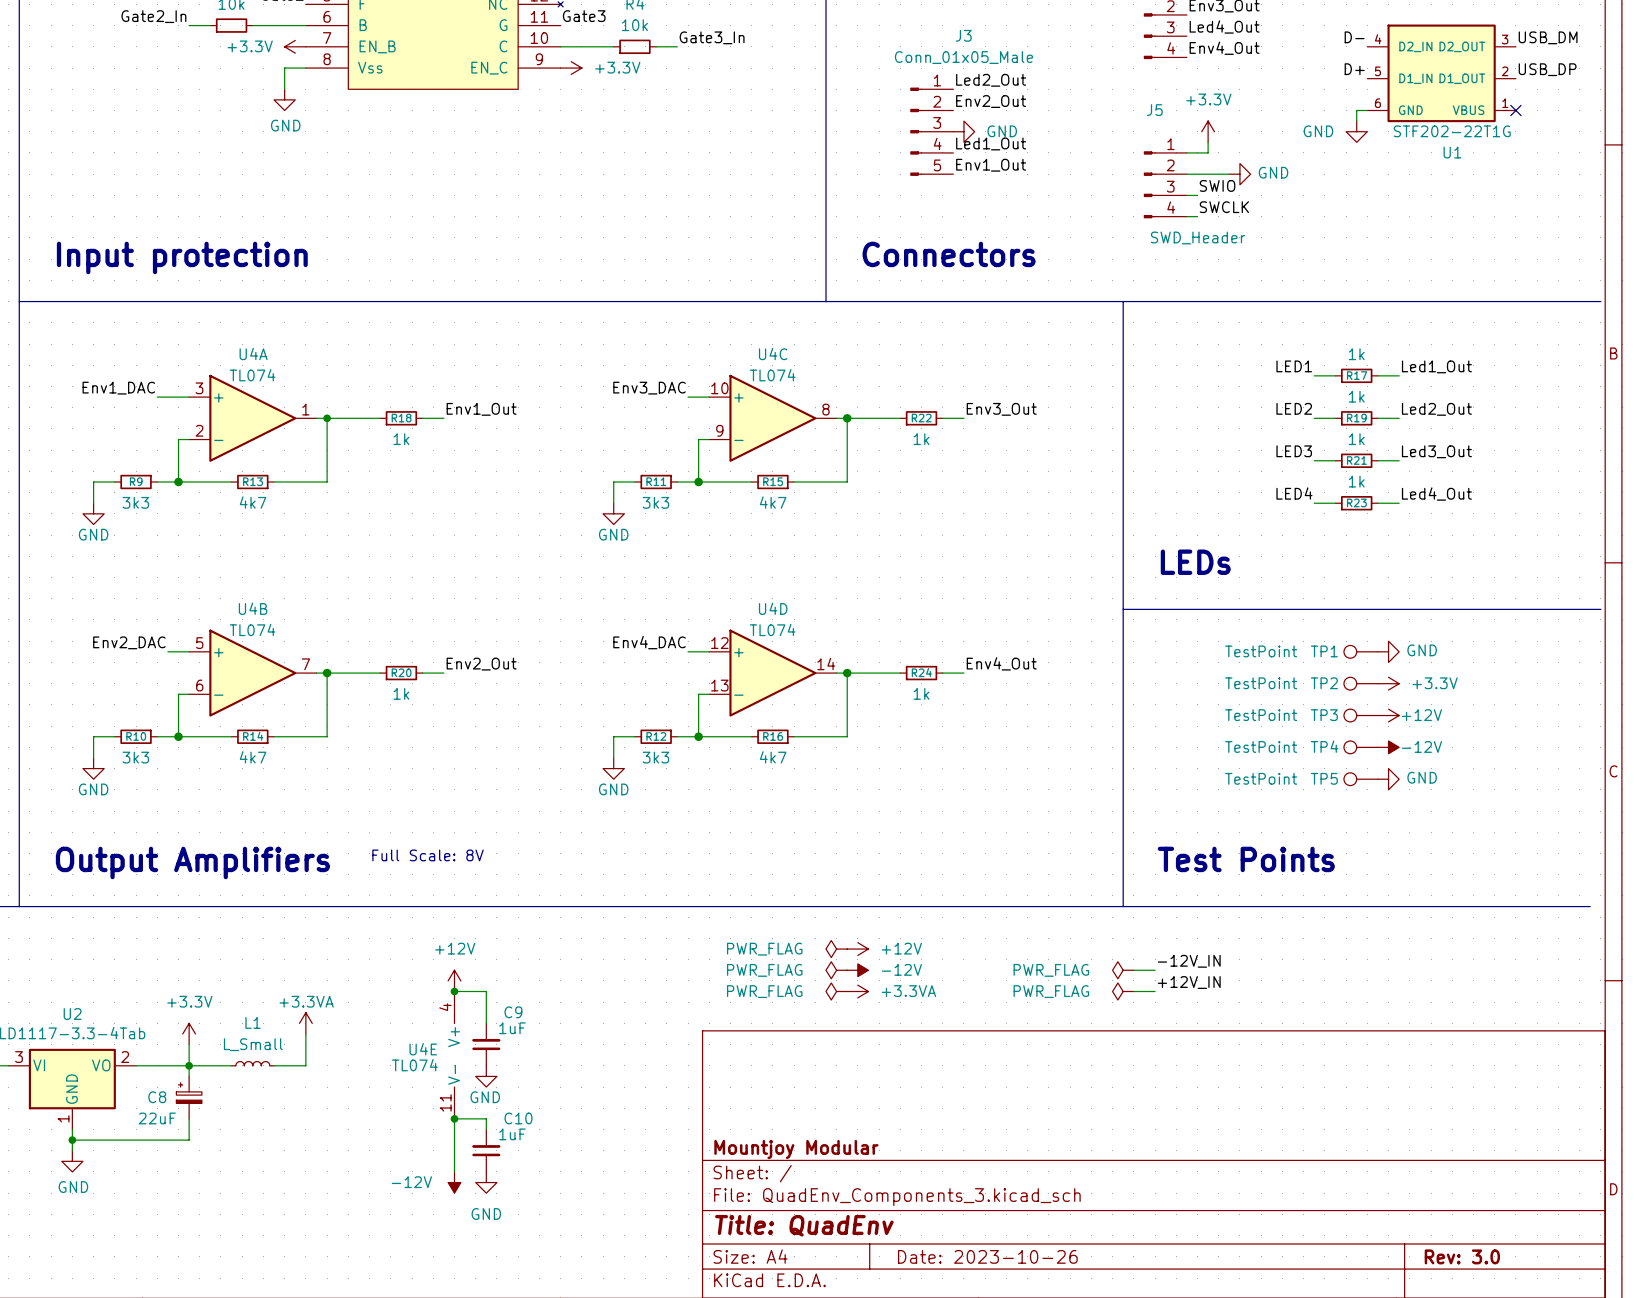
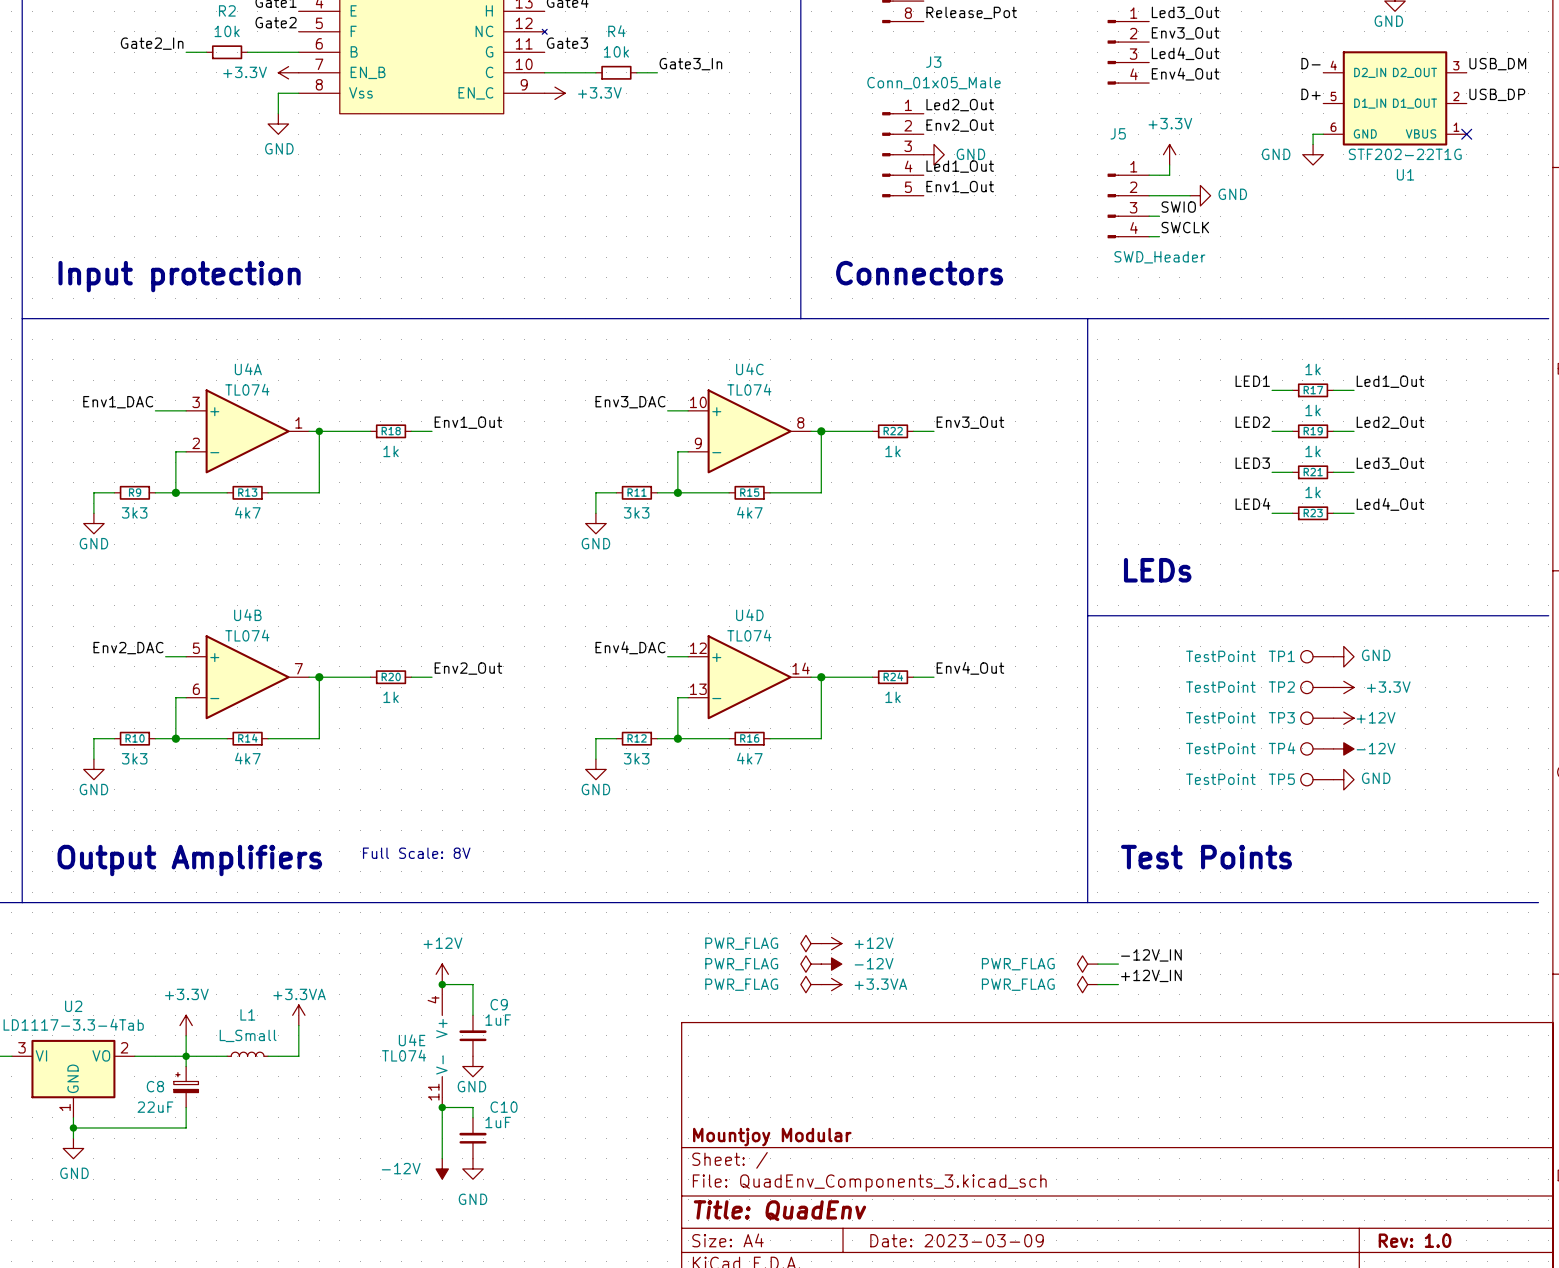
title block: Date: 2023-10-26 (987, 1256) -> Date: 2023-03-09 (957, 1240)
title block: Rev: 3.0 (1462, 1256) -> Rev: 1.0 (1415, 1240)

